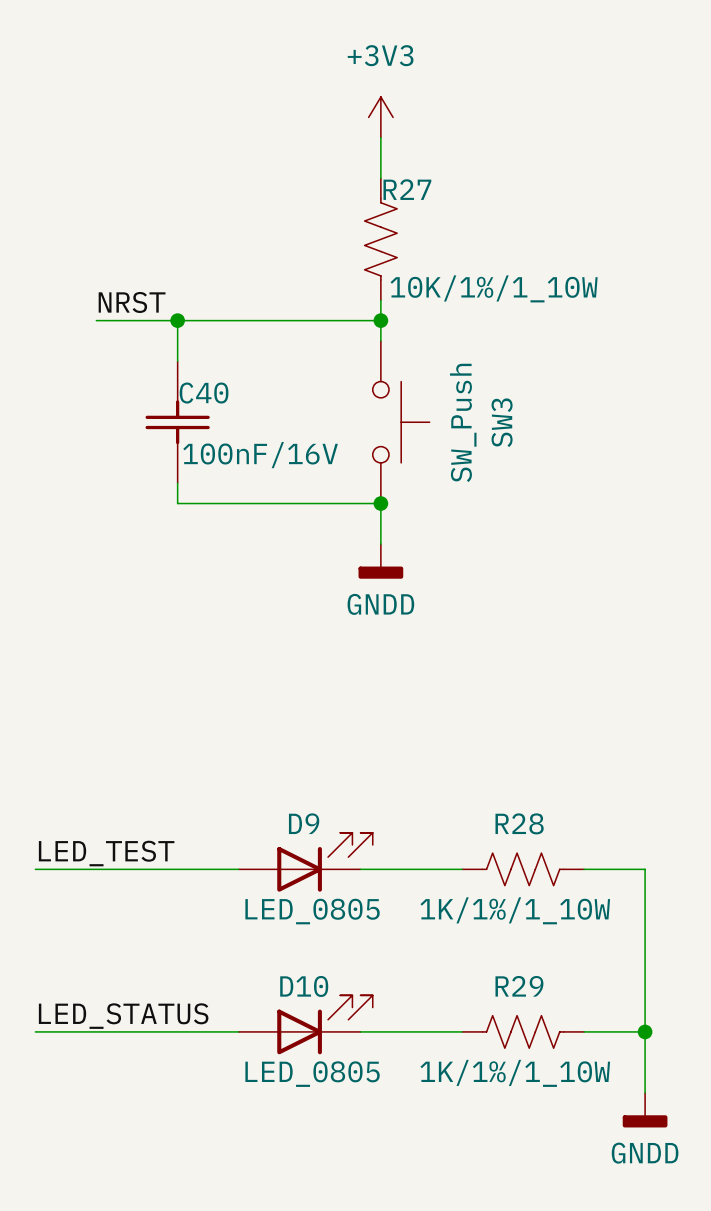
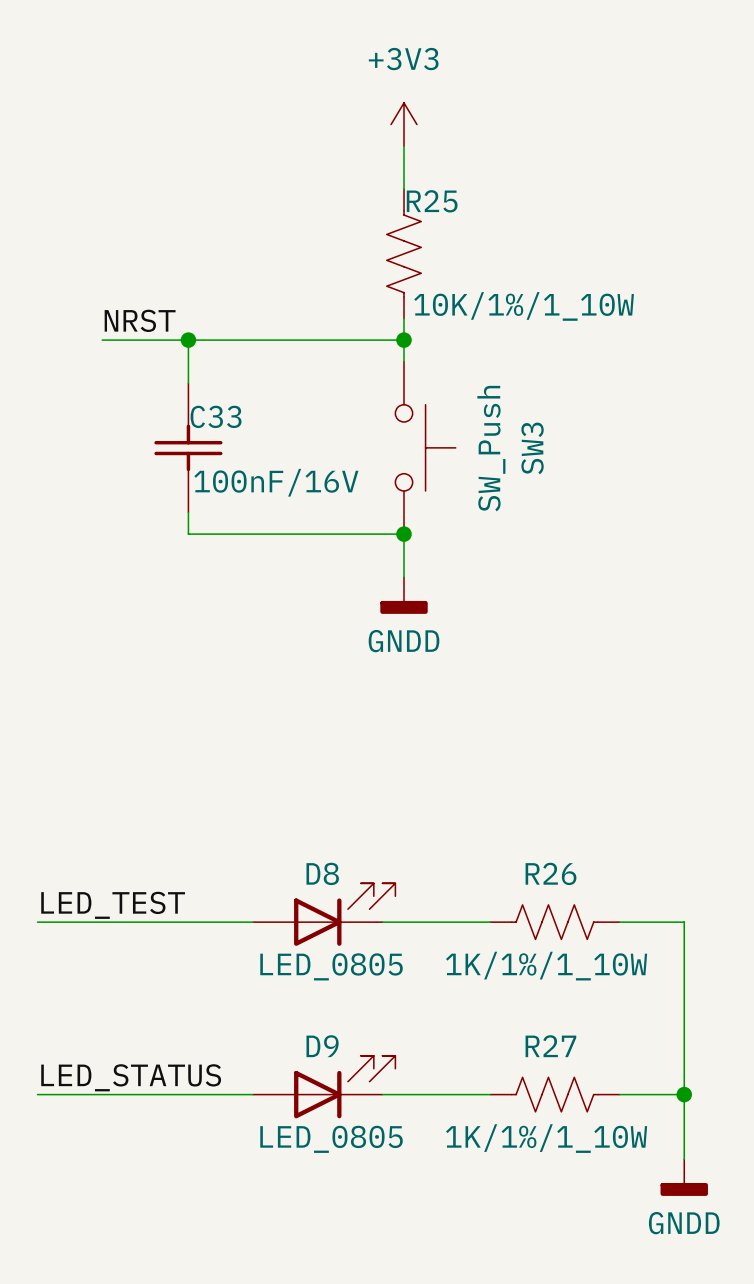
R27 name: R27 (407, 189) -> R25 (432, 201)
C40 name: C40 (204, 393) -> C33 (216, 416)
D9 name: D9 (304, 823) -> D8 (322, 873)
R28 name: R28 (519, 823) -> R26 (550, 873)
D10 name: D10 (304, 986) -> D9 (322, 1046)
R29 name: R29 (519, 986) -> R27 (550, 1046)

